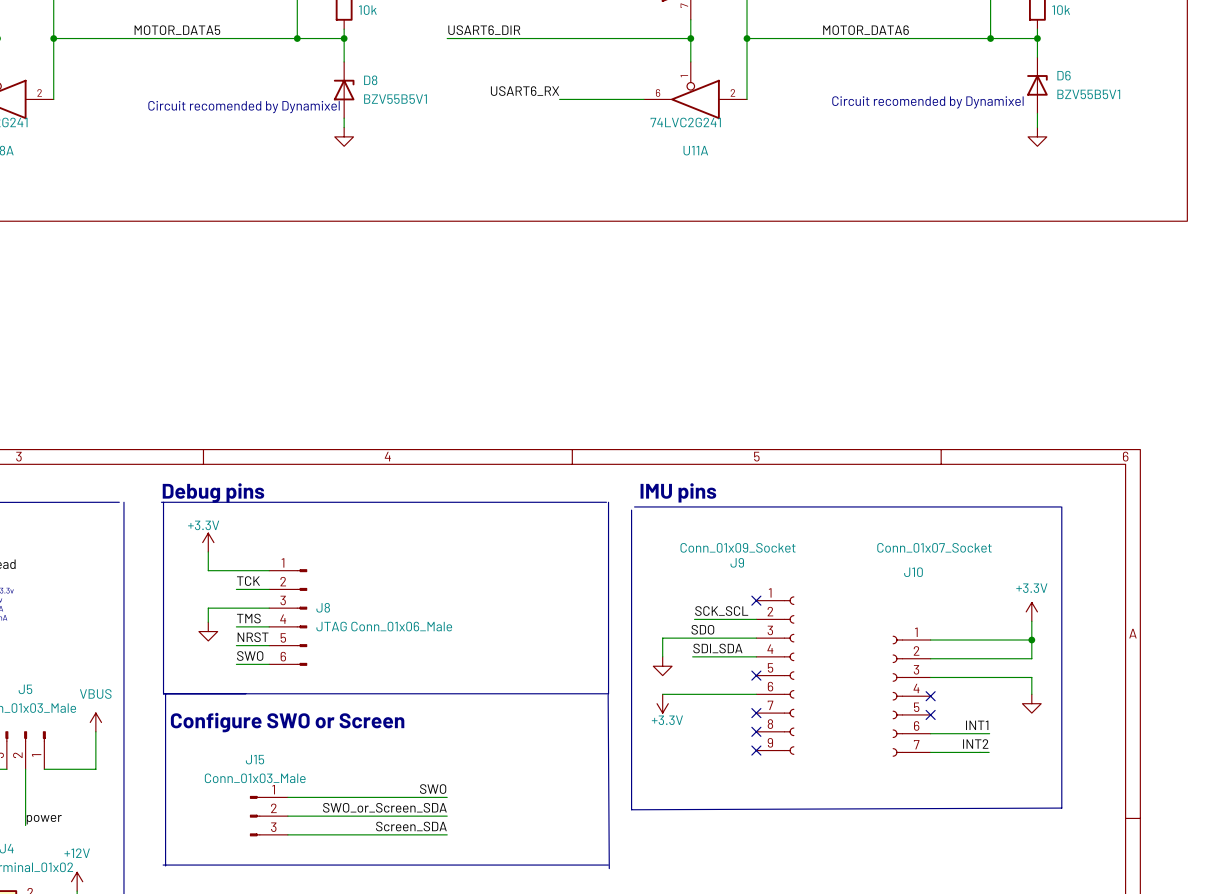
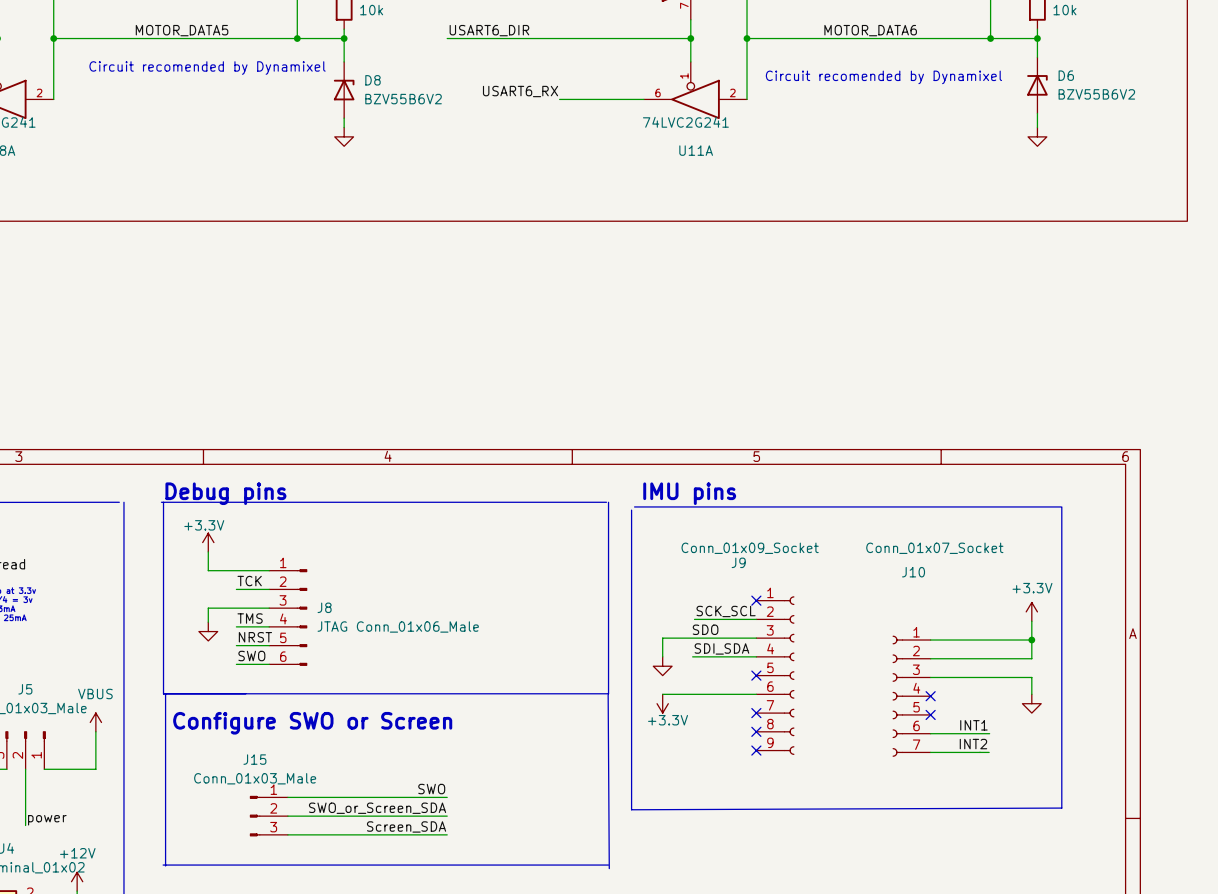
D6 value: BZV55B5V1 (1088, 94) -> BZV55B6V2 (1096, 94)
D8 value: BZV55B5V1 (395, 99) -> BZV55B6V2 (403, 99)
text position: Circuit recomended by Dynamixel (927, 102) -> Circuit recomended by Dynamixel (883, 77)
text position: Circuit recomended by Dynamixel (244, 107) -> Circuit recomended by Dynamixel (207, 68)

